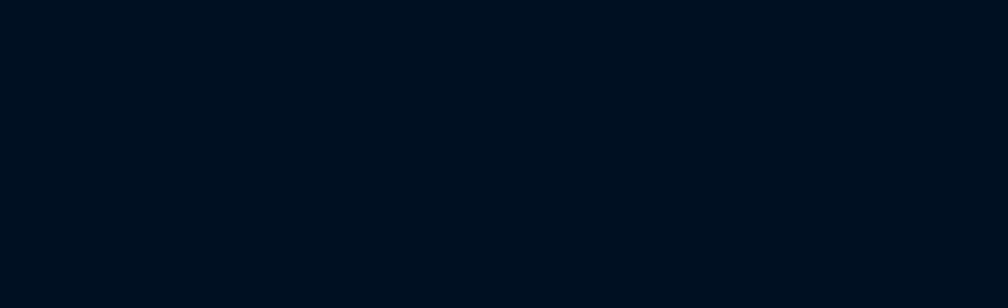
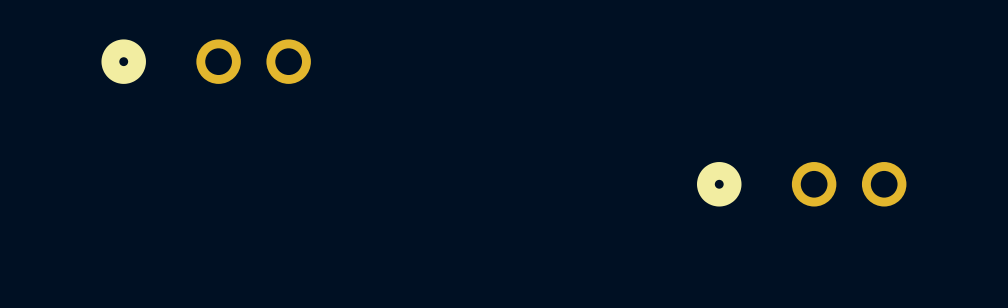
part: none -> (206, 61)
part: none -> (801, 184)

